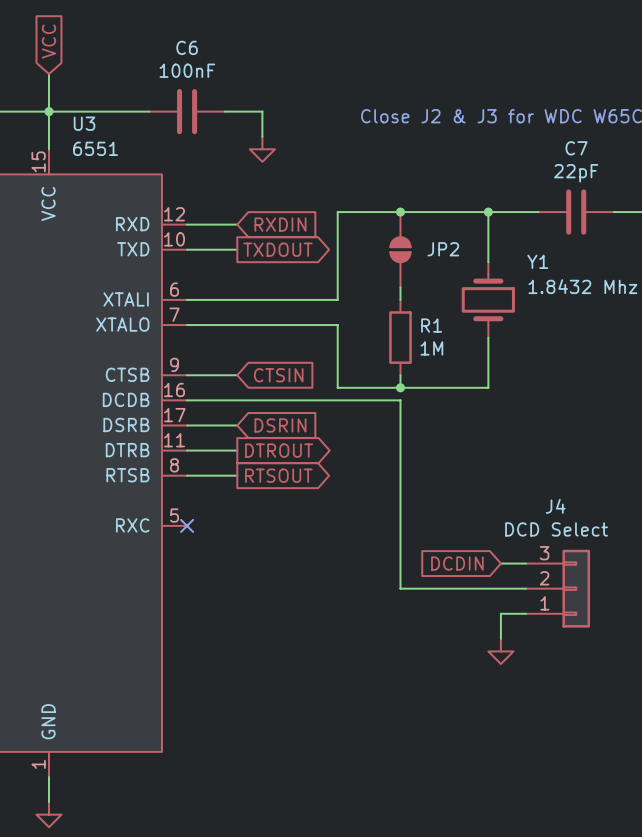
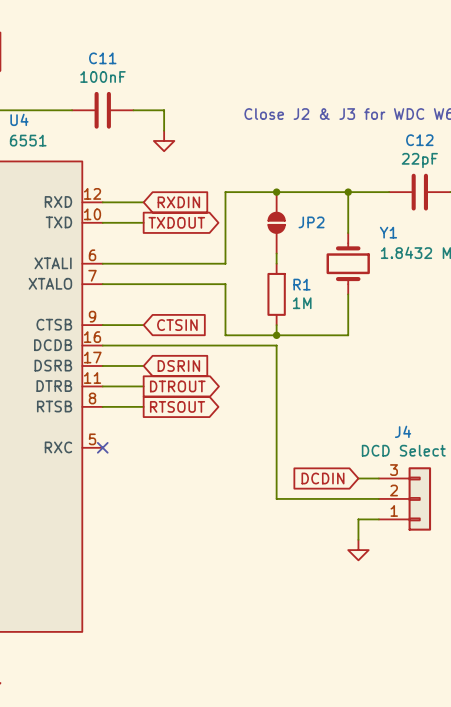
C6 name: C6 (187, 47) -> C11 (102, 58)
U3 name: U3 (84, 123) -> U4 (19, 119)
C7 name: C7 (576, 148) -> C12 (419, 140)

